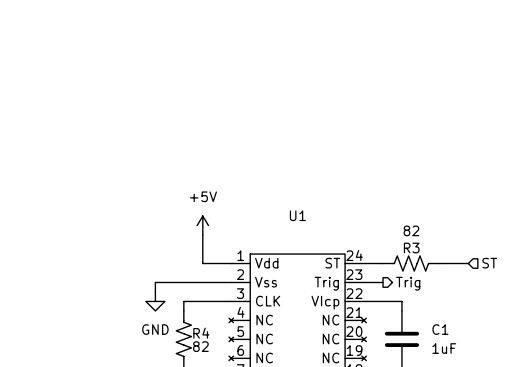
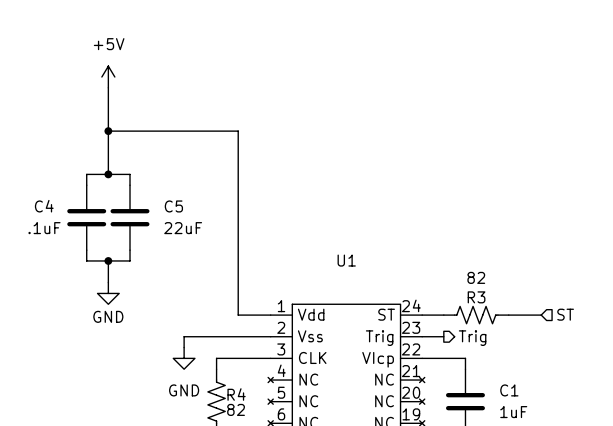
power symbol: none -> +5V (108, 77)
wire: none -> (108, 87) (108, 174)
wire: none -> (108, 131) (238, 131) (238, 282)
junction: none -> (108, 131)
junction: none -> (108, 174)
wire: none -> (86, 185) (86, 174) (130, 174) (130, 185)
C4: none -> .1uF (86, 217)
C5: none -> 22uF (130, 217)
wire: none -> (86, 250) (86, 260) (130, 260) (130, 250)
wire: none -> (108, 260) (108, 282)
junction: none -> (108, 260)
power symbol: +5V (202, 225) -> none
power symbol: none -> GND (108, 293)

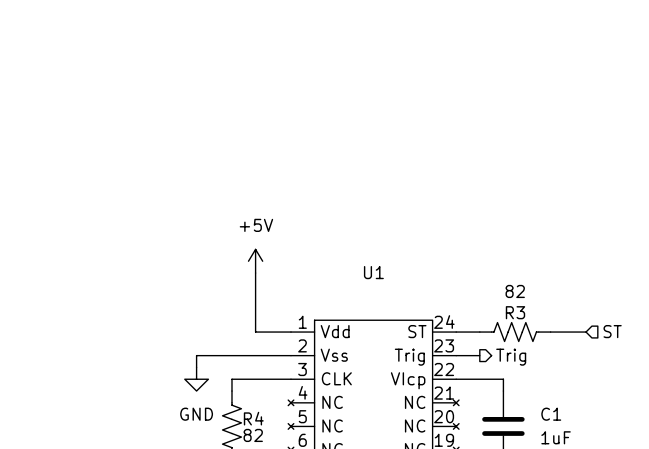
power symbol: +5V (108, 77) -> none
wire: (108, 87) (108, 174) -> none
wire: (108, 131) (238, 131) (238, 260) -> none
junction: (108, 131) -> none
junction: (108, 174) -> none
wire: (86, 185) (86, 174) (130, 174) (130, 185) -> none
C4: .1uF (86, 217) -> none
C5: 22uF (130, 217) -> none
wire: (86, 250) (86, 260) (130, 260) (130, 250) -> none
power symbol: none -> +5V (255, 261)
wire: (108, 260) (108, 282) -> none
junction: (108, 260) -> none
power symbol: GND (108, 293) -> none

